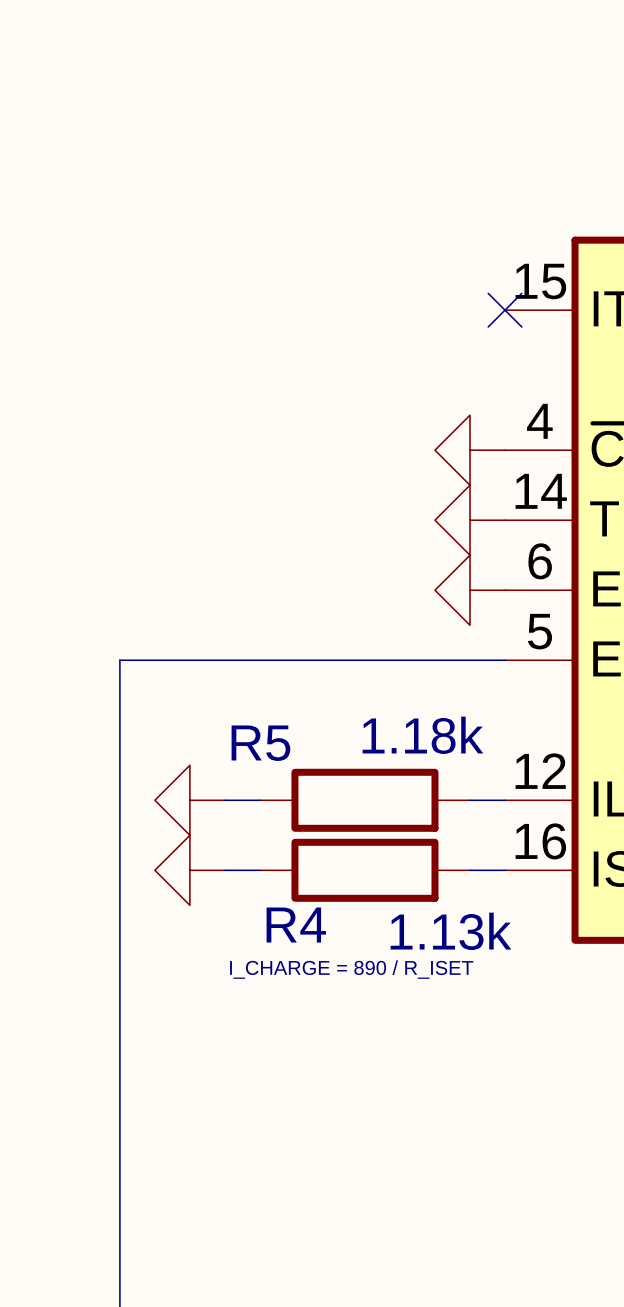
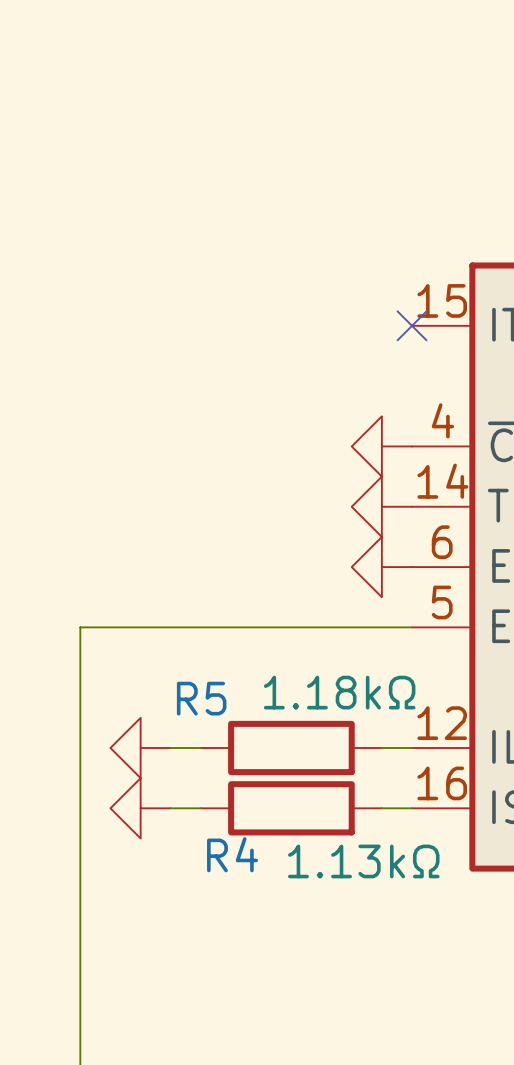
R5 value: 1.18k (422, 735) -> 1.18kΩ (339, 692)
R4 value: 1.13k (450, 931) -> 1.13kΩ (363, 861)
text: I_CHARGE = 890 / R_ISET (351, 969) -> none

